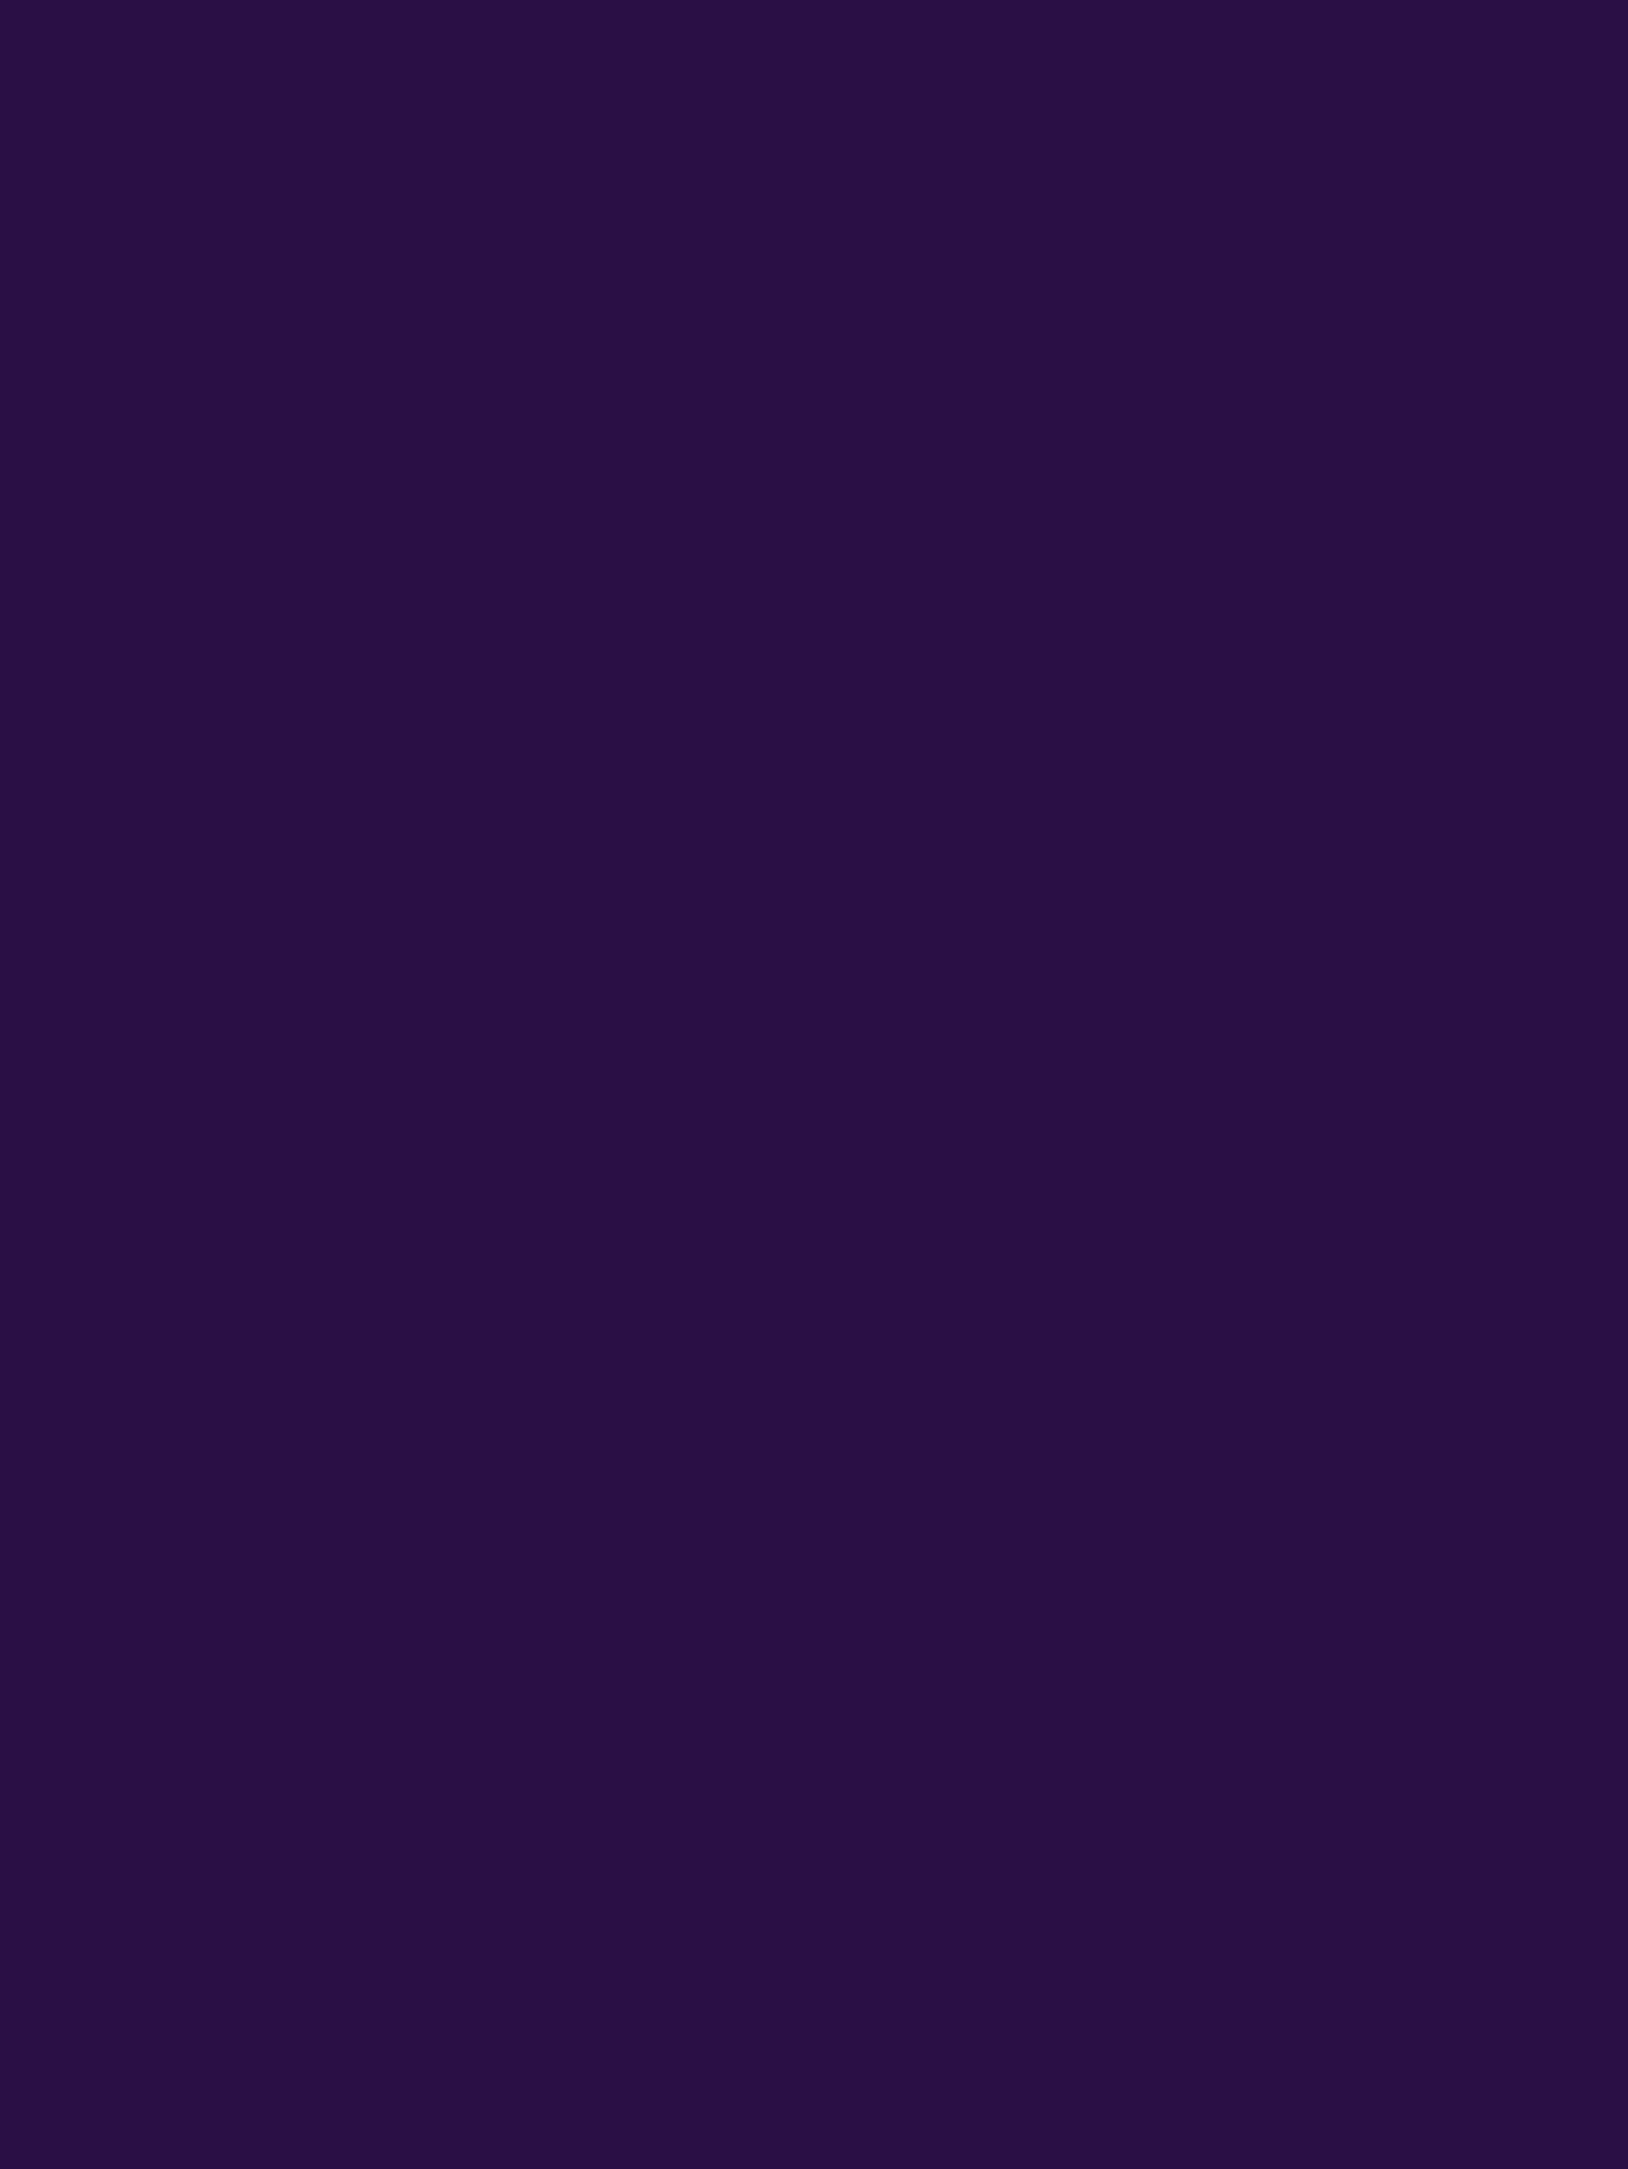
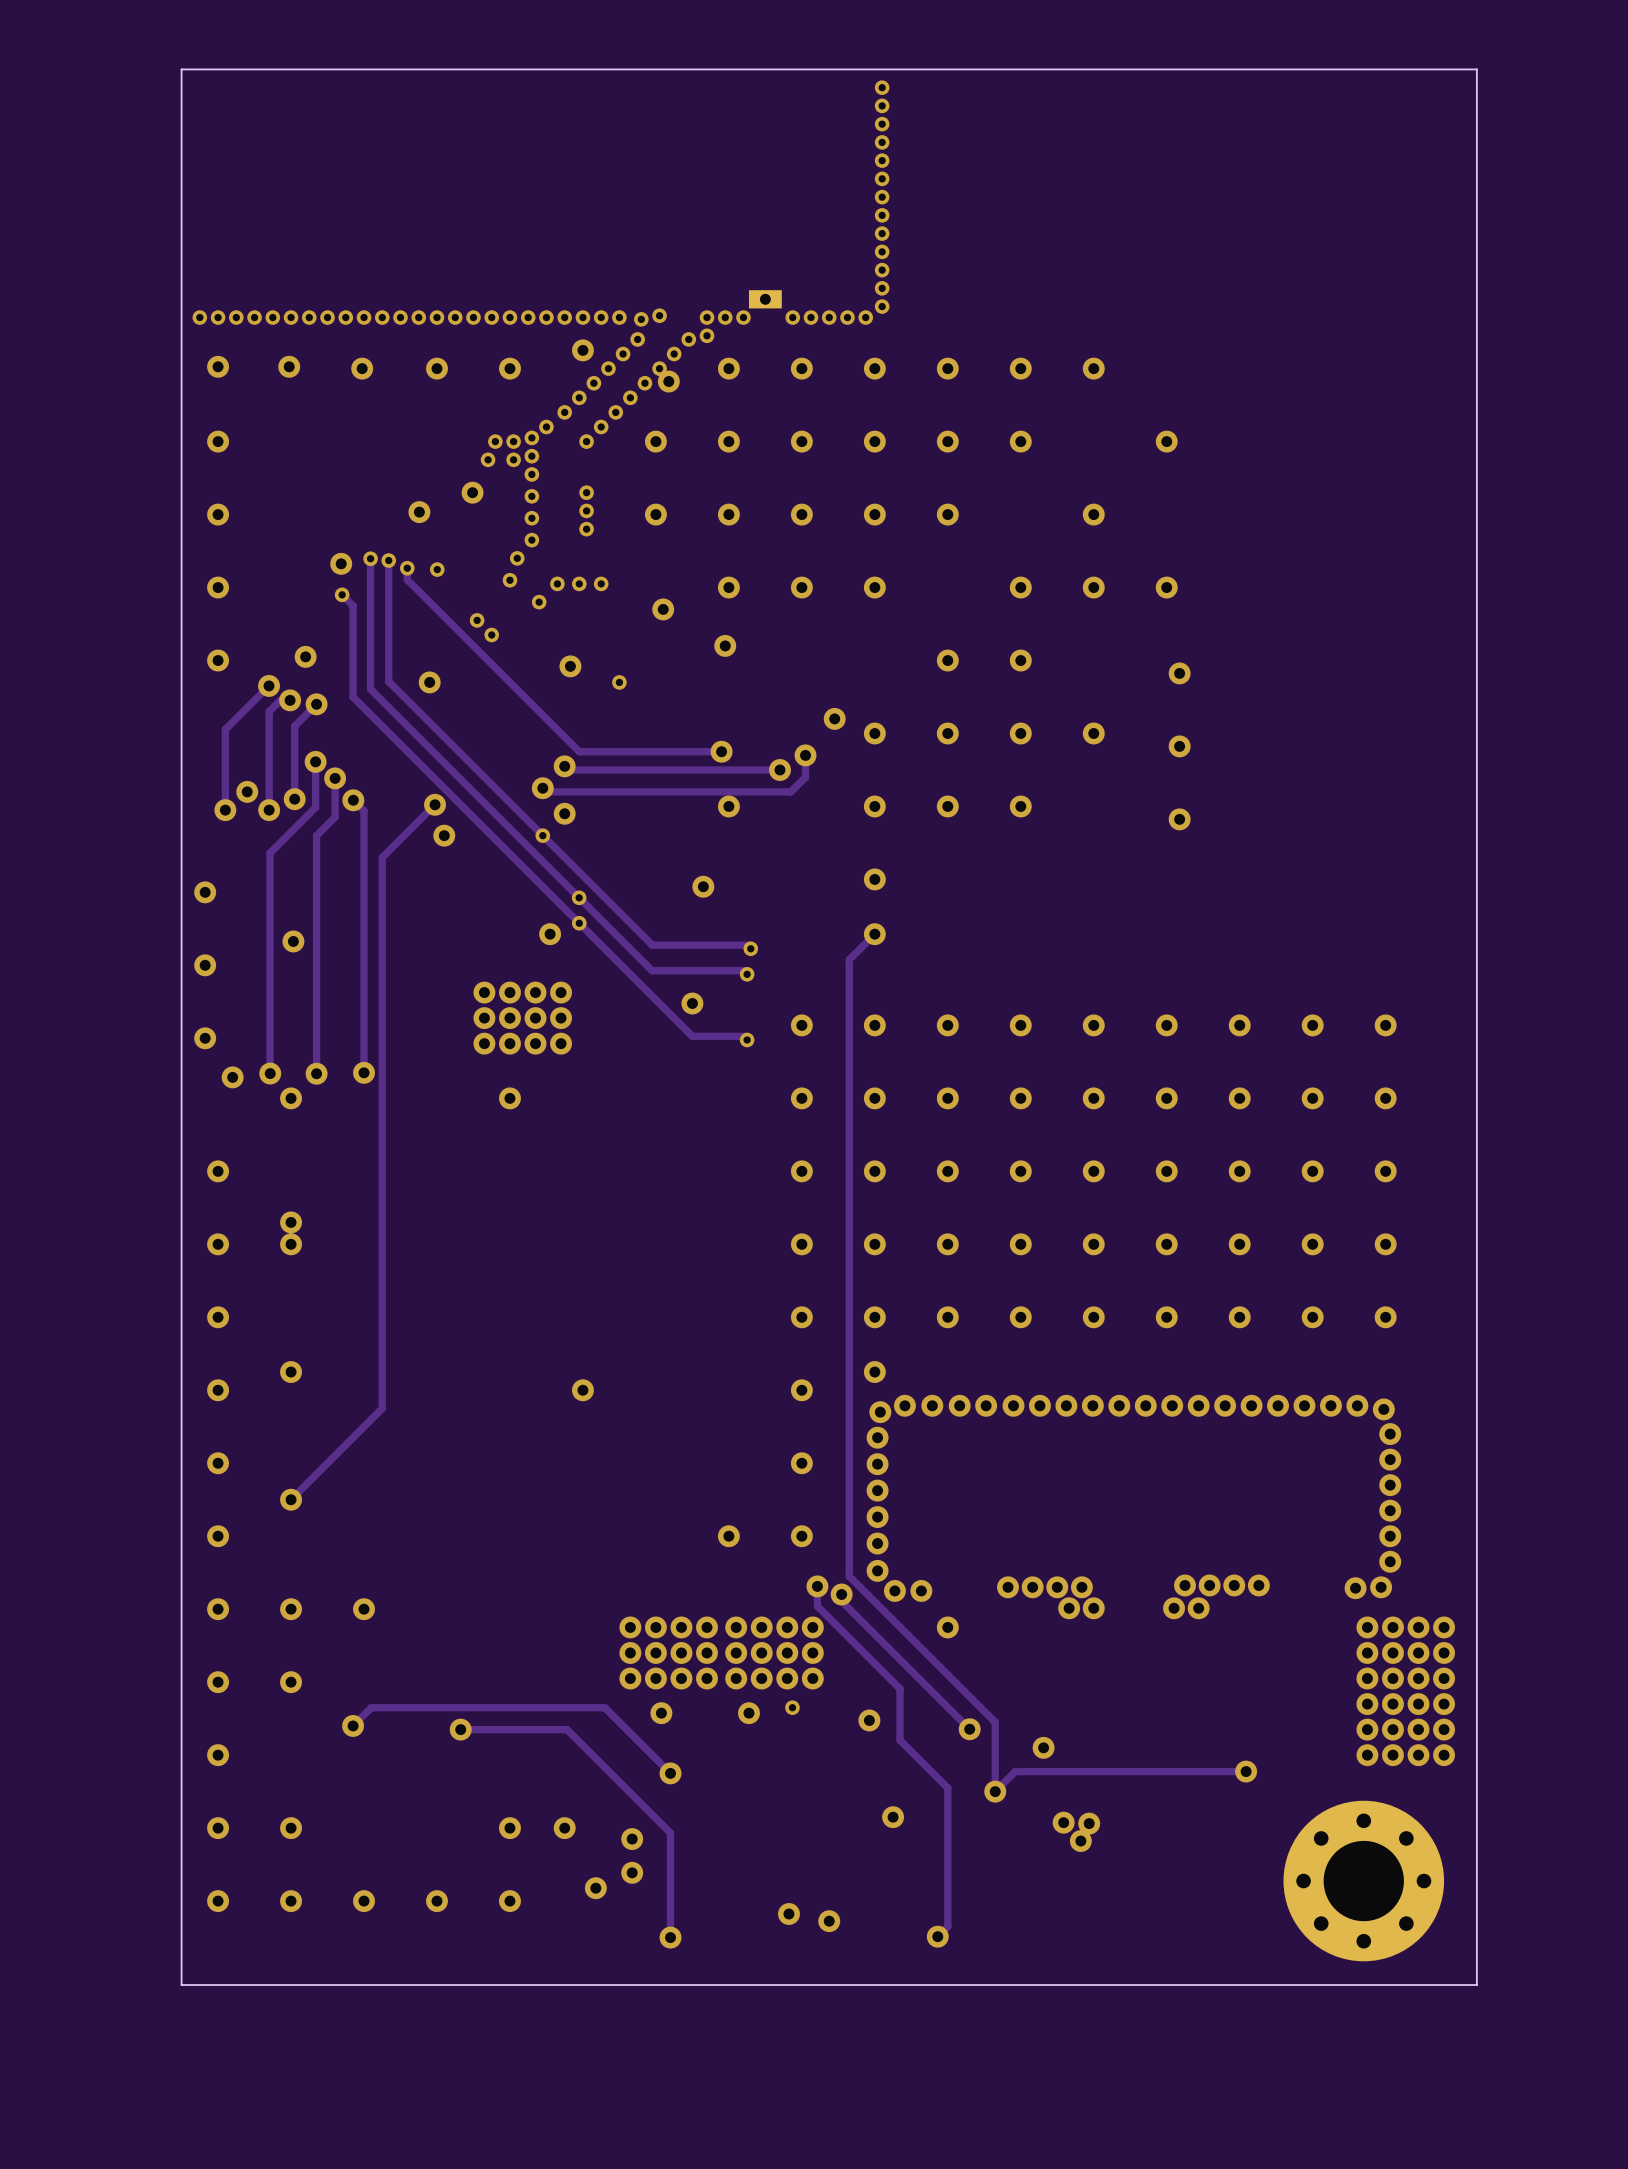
board edge: none -> (1476, 69) (181, 69) (181, 1985) (1476, 1985) (1476, 69)
via: none -> (882, 87)
via: none -> (882, 105)
via: none -> (882, 124)
via: none -> (882, 142)
via: none -> (882, 160)
via: none -> (882, 178)
via: none -> (882, 197)
via: none -> (882, 215)
via: none -> (882, 233)
via: none -> (882, 251)
via: none -> (882, 270)
via: none -> (882, 288)
part: none -> (765, 299)
via: none -> (882, 306)
via: none -> (659, 315)
via: none -> (199, 317)
via: none -> (218, 317)
via: none -> (236, 317)
via: none -> (254, 317)
via: none -> (272, 317)
via: none -> (291, 317)
via: none -> (309, 317)
via: none -> (327, 317)
via: none -> (345, 317)
via: none -> (364, 317)
via: none -> (382, 317)
via: none -> (400, 317)
via: none -> (418, 317)
via: none -> (436, 317)
via: none -> (455, 317)
via: none -> (473, 317)
via: none -> (491, 317)
via: none -> (509, 317)
via: none -> (528, 317)
via: none -> (546, 317)
via: none -> (564, 317)
via: none -> (582, 317)
via: none -> (601, 317)
via: none -> (619, 317)
via: none -> (707, 317)
via: none -> (725, 317)
via: none -> (743, 317)
via: none -> (792, 317)
via: none -> (810, 317)
via: none -> (829, 317)
via: none -> (847, 317)
via: none -> (865, 317)
via: none -> (641, 319)
via: none -> (707, 335)
via: none -> (637, 339)
via: none -> (688, 339)
via: none -> (582, 350)
via: none -> (623, 354)
via: none -> (674, 354)
via: none -> (218, 366)
via: none -> (289, 366)
via: none -> (362, 368)
via: none -> (436, 368)
via: none -> (509, 368)
via: none -> (608, 368)
via: none -> (659, 368)
via: none -> (728, 368)
via: none -> (801, 368)
via: none -> (874, 368)
via: none -> (947, 368)
via: none -> (1020, 368)
via: none -> (1093, 368)
via: none -> (668, 381)
via: none -> (593, 383)
via: none -> (644, 383)
via: none -> (579, 397)
via: none -> (630, 397)
via: none -> (564, 412)
via: none -> (615, 412)
via: none -> (546, 427)
via: none -> (601, 427)
via: none -> (531, 437)
via: none -> (218, 441)
via: none -> (495, 441)
via: none -> (513, 441)
via: none -> (586, 441)
via: none -> (655, 441)
via: none -> (728, 441)
via: none -> (801, 441)
via: none -> (874, 441)
via: none -> (947, 441)
via: none -> (1020, 441)
via: none -> (1166, 441)
via: none -> (531, 456)
via: none -> (488, 459)
via: none -> (513, 459)
via: none -> (531, 474)
via: none -> (472, 492)
via: none -> (586, 492)
via: none -> (531, 496)
via: none -> (586, 510)
via: none -> (419, 512)
via: none -> (218, 514)
via: none -> (655, 514)
via: none -> (728, 514)
via: none -> (801, 514)
via: none -> (874, 514)
via: none -> (947, 514)
via: none -> (1093, 514)
via: none -> (531, 518)
via: none -> (586, 529)
via: none -> (531, 540)
track: none -> (370, 558) (370, 689) (652, 970) (747, 970)
via: none -> (370, 558)
via: none -> (517, 558)
track: none -> (388, 560) (388, 681) (652, 945) (750, 945)
via: none -> (388, 560)
via: none -> (341, 563)
track: none -> (407, 568) (407, 579) (579, 751) (721, 751)
via: none -> (407, 568)
via: none -> (437, 569)
via: none -> (509, 580)
via: none -> (557, 583)
via: none -> (579, 583)
via: none -> (601, 583)
via: none -> (218, 587)
via: none -> (728, 587)
via: none -> (801, 587)
via: none -> (874, 587)
via: none -> (1020, 587)
via: none -> (1093, 587)
via: none -> (1166, 587)
track: none -> (342, 594) (353, 605) (353, 697) (692, 1036) (747, 1036)
via: none -> (342, 594)
via: none -> (539, 602)
via: none -> (663, 609)
via: none -> (477, 620)
via: none -> (491, 634)
via: none -> (725, 645)
via: none -> (305, 656)
via: none -> (218, 660)
via: none -> (947, 660)
via: none -> (1020, 660)
via: none -> (570, 666)
via: none -> (1179, 673)
via: none -> (429, 682)
via: none -> (619, 682)
track: none -> (269, 685) (225, 729) (225, 810)
via: none -> (269, 685)
track: none -> (290, 700) (280, 700) (269, 711) (269, 810)
via: none -> (290, 700)
track: none -> (316, 704) (294, 726) (294, 799)
via: none -> (316, 704)
via: none -> (834, 718)
via: none -> (874, 733)
via: none -> (947, 733)
via: none -> (1020, 733)
via: none -> (1093, 733)
via: none -> (1179, 746)
via: none -> (721, 751)
track: none -> (805, 755) (805, 777) (790, 791) (546, 791) (542, 788)
via: none -> (805, 755)
track: none -> (315, 761) (315, 807) (270, 852) (270, 1073)
via: none -> (315, 761)
track: none -> (564, 766) (568, 769) (779, 769)
via: none -> (564, 766)
via: none -> (779, 769)
track: none -> (335, 778) (335, 817) (316, 835) (316, 1073)
via: none -> (335, 778)
via: none -> (542, 788)
via: none -> (247, 791)
via: none -> (294, 799)
track: none -> (353, 800) (364, 810) (364, 1072)
via: none -> (353, 800)
track: none -> (435, 804) (382, 857) (382, 1408) (291, 1499)
via: none -> (435, 804)
via: none -> (728, 806)
via: none -> (874, 806)
via: none -> (947, 806)
via: none -> (1020, 806)
via: none -> (225, 810)
via: none -> (269, 810)
via: none -> (564, 813)
via: none -> (1179, 819)
via: none -> (444, 835)
via: none -> (542, 835)
via: none -> (874, 879)
via: none -> (703, 886)
via: none -> (205, 892)
via: none -> (579, 897)
via: none -> (579, 923)
via: none -> (550, 934)
track: none -> (874, 934) (849, 959) (849, 1576) (995, 1722) (995, 1791) (1015, 1771) (1246, 1771)
via: none -> (874, 934)
via: none -> (293, 941)
via: none -> (750, 948)
via: none -> (205, 965)
via: none -> (747, 974)
via: none -> (484, 992)
via: none -> (509, 992)
via: none -> (535, 992)
via: none -> (561, 992)
via: none -> (692, 1003)
via: none -> (484, 1018)
via: none -> (509, 1018)
via: none -> (535, 1018)
via: none -> (561, 1018)
via: none -> (801, 1025)
via: none -> (874, 1025)
via: none -> (947, 1025)
via: none -> (1020, 1025)
via: none -> (1093, 1025)
via: none -> (1166, 1025)
via: none -> (1239, 1025)
via: none -> (1312, 1025)
via: none -> (1385, 1025)
via: none -> (205, 1038)
via: none -> (747, 1039)
via: none -> (484, 1043)
via: none -> (509, 1043)
via: none -> (535, 1043)
via: none -> (561, 1043)
via: none -> (364, 1072)
via: none -> (270, 1073)
via: none -> (316, 1073)
via: none -> (232, 1077)
via: none -> (291, 1098)
via: none -> (509, 1098)
via: none -> (801, 1098)
via: none -> (874, 1098)
via: none -> (947, 1098)
via: none -> (1020, 1098)
via: none -> (1093, 1098)
via: none -> (1166, 1098)
via: none -> (1239, 1098)
via: none -> (1312, 1098)
via: none -> (1385, 1098)
via: none -> (218, 1171)
via: none -> (801, 1171)
via: none -> (874, 1171)
via: none -> (947, 1171)
via: none -> (1020, 1171)
via: none -> (1093, 1171)
via: none -> (1166, 1171)
via: none -> (1239, 1171)
via: none -> (1312, 1171)
via: none -> (1385, 1171)
via: none -> (291, 1222)
via: none -> (218, 1244)
via: none -> (291, 1244)
via: none -> (801, 1244)
via: none -> (874, 1244)
via: none -> (947, 1244)
via: none -> (1020, 1244)
via: none -> (1093, 1244)
via: none -> (1166, 1244)
via: none -> (1239, 1244)
via: none -> (1312, 1244)
via: none -> (1385, 1244)
via: none -> (218, 1317)
via: none -> (801, 1317)
via: none -> (874, 1317)
via: none -> (947, 1317)
via: none -> (1020, 1317)
via: none -> (1093, 1317)
via: none -> (1166, 1317)
via: none -> (1239, 1317)
via: none -> (1312, 1317)
via: none -> (1385, 1317)
via: none -> (291, 1372)
via: none -> (874, 1372)
via: none -> (218, 1390)
via: none -> (582, 1390)
via: none -> (801, 1390)
via: none -> (904, 1405)
via: none -> (932, 1405)
via: none -> (959, 1405)
via: none -> (986, 1405)
via: none -> (1013, 1405)
via: none -> (1039, 1405)
via: none -> (1066, 1405)
via: none -> (1092, 1405)
via: none -> (1119, 1405)
via: none -> (1145, 1405)
via: none -> (1172, 1405)
via: none -> (1198, 1405)
via: none -> (1225, 1405)
via: none -> (1251, 1405)
via: none -> (1278, 1405)
via: none -> (1304, 1405)
via: none -> (1330, 1405)
via: none -> (1357, 1405)
via: none -> (1383, 1409)
via: none -> (880, 1412)
via: none -> (1390, 1434)
via: none -> (877, 1437)
via: none -> (1390, 1459)
via: none -> (218, 1463)
via: none -> (801, 1463)
via: none -> (877, 1464)
via: none -> (1390, 1485)
via: none -> (877, 1490)
via: none -> (291, 1499)
via: none -> (1390, 1510)
via: none -> (877, 1517)
via: none -> (218, 1536)
via: none -> (728, 1536)
via: none -> (801, 1536)
via: none -> (1390, 1536)
via: none -> (877, 1543)
via: none -> (1390, 1561)
via: none -> (877, 1570)
via: none -> (1184, 1585)
via: none -> (1209, 1585)
via: none -> (1234, 1585)
via: none -> (1258, 1585)
track: none -> (817, 1586) (817, 1606) (900, 1688) (900, 1740) (947, 1787) (947, 1926) (937, 1936)
via: none -> (817, 1586)
via: none -> (1008, 1587)
via: none -> (1032, 1587)
via: none -> (1057, 1587)
via: none -> (1081, 1587)
via: none -> (1381, 1587)
via: none -> (1355, 1588)
via: none -> (894, 1590)
via: none -> (921, 1590)
track: none -> (841, 1594) (841, 1601) (969, 1729)
via: none -> (841, 1594)
via: none -> (1069, 1608)
via: none -> (1093, 1608)
via: none -> (1174, 1608)
via: none -> (1198, 1608)
via: none -> (218, 1609)
via: none -> (291, 1609)
via: none -> (364, 1609)
via: none -> (630, 1627)
via: none -> (655, 1627)
via: none -> (681, 1627)
via: none -> (707, 1627)
via: none -> (736, 1627)
via: none -> (761, 1627)
via: none -> (787, 1627)
via: none -> (812, 1627)
via: none -> (947, 1627)
via: none -> (1367, 1627)
via: none -> (1392, 1627)
via: none -> (1418, 1627)
via: none -> (1444, 1627)
via: none -> (630, 1652)
via: none -> (655, 1652)
via: none -> (681, 1652)
via: none -> (707, 1652)
via: none -> (736, 1652)
via: none -> (761, 1652)
via: none -> (787, 1652)
via: none -> (812, 1652)
via: none -> (1367, 1652)
via: none -> (1392, 1652)
via: none -> (1418, 1652)
via: none -> (1444, 1652)
via: none -> (630, 1678)
via: none -> (655, 1678)
via: none -> (681, 1678)
via: none -> (707, 1678)
via: none -> (736, 1678)
via: none -> (761, 1678)
via: none -> (787, 1678)
via: none -> (812, 1678)
via: none -> (1367, 1678)
via: none -> (1392, 1678)
via: none -> (1418, 1678)
via: none -> (1444, 1678)
via: none -> (218, 1682)
via: none -> (291, 1682)
via: none -> (1367, 1704)
via: none -> (1392, 1704)
via: none -> (1418, 1704)
via: none -> (1444, 1704)
via: none -> (792, 1707)
via: none -> (661, 1713)
via: none -> (748, 1713)
via: none -> (869, 1720)
track: none -> (353, 1725) (371, 1707) (604, 1707) (670, 1773)
via: none -> (353, 1725)
track: none -> (460, 1729) (567, 1729) (670, 1833) (670, 1937)
via: none -> (460, 1729)
via: none -> (969, 1729)
via: none -> (1367, 1729)
via: none -> (1392, 1729)
via: none -> (1418, 1729)
via: none -> (1444, 1729)
via: none -> (1043, 1747)
via: none -> (218, 1755)
via: none -> (1367, 1755)
via: none -> (1392, 1755)
via: none -> (1418, 1755)
via: none -> (1444, 1755)
via: none -> (1246, 1771)
via: none -> (670, 1773)
via: none -> (995, 1791)
via: none -> (893, 1817)
via: none -> (1063, 1822)
via: none -> (1089, 1823)
via: none -> (218, 1828)
via: none -> (291, 1828)
via: none -> (509, 1828)
via: none -> (564, 1828)
via: none -> (632, 1839)
via: none -> (1080, 1841)
via: none -> (632, 1872)
part: none -> (1363, 1881)
via: none -> (595, 1888)
via: none -> (218, 1901)
via: none -> (291, 1901)
via: none -> (364, 1901)
via: none -> (436, 1901)
via: none -> (509, 1901)
via: none -> (788, 1914)
via: none -> (829, 1921)
via: none -> (937, 1936)
via: none -> (670, 1937)

